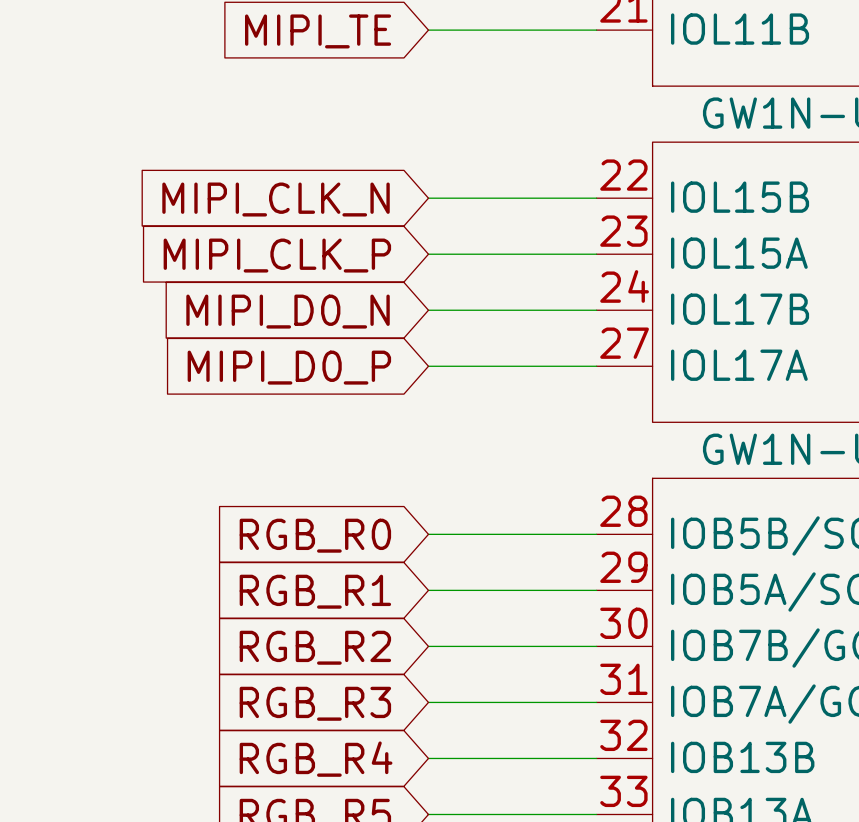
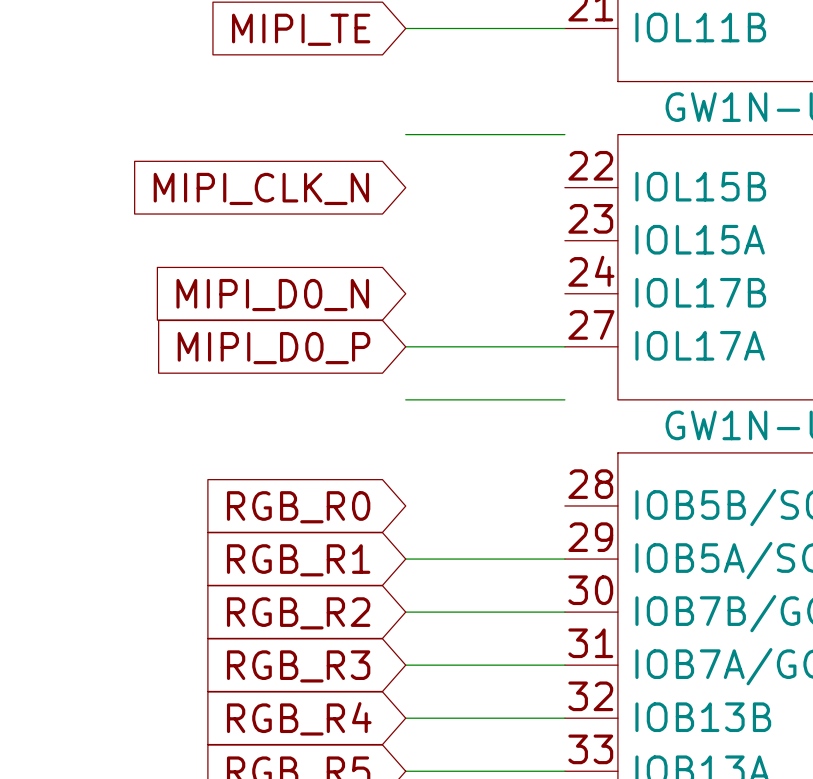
wire: (428, 198) (596, 198) -> (405, 399) (564, 399)
wire: (428, 254) (596, 254) -> (405, 134) (564, 134)
global label: MIPI_CLK_P (277, 255) -> none
wire: (428, 310) (596, 310) -> none
wire: (428, 534) (596, 534) -> none

